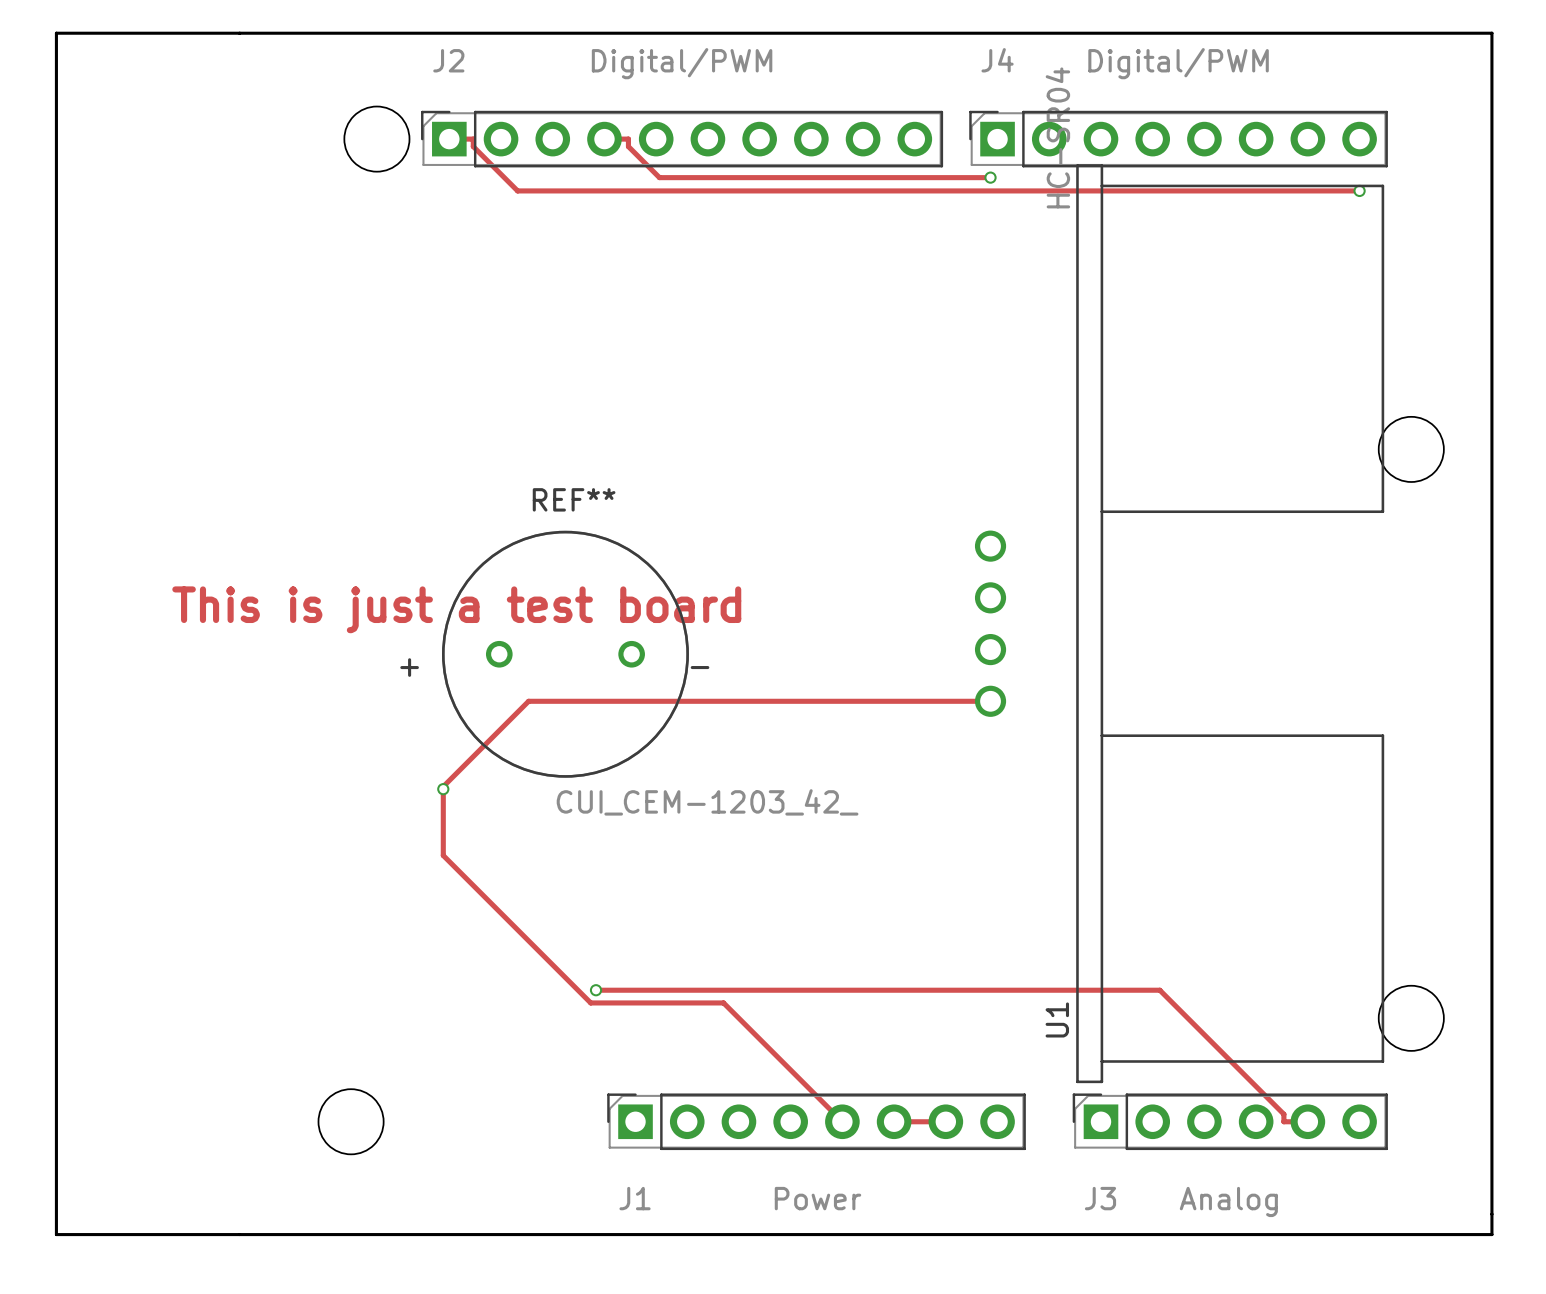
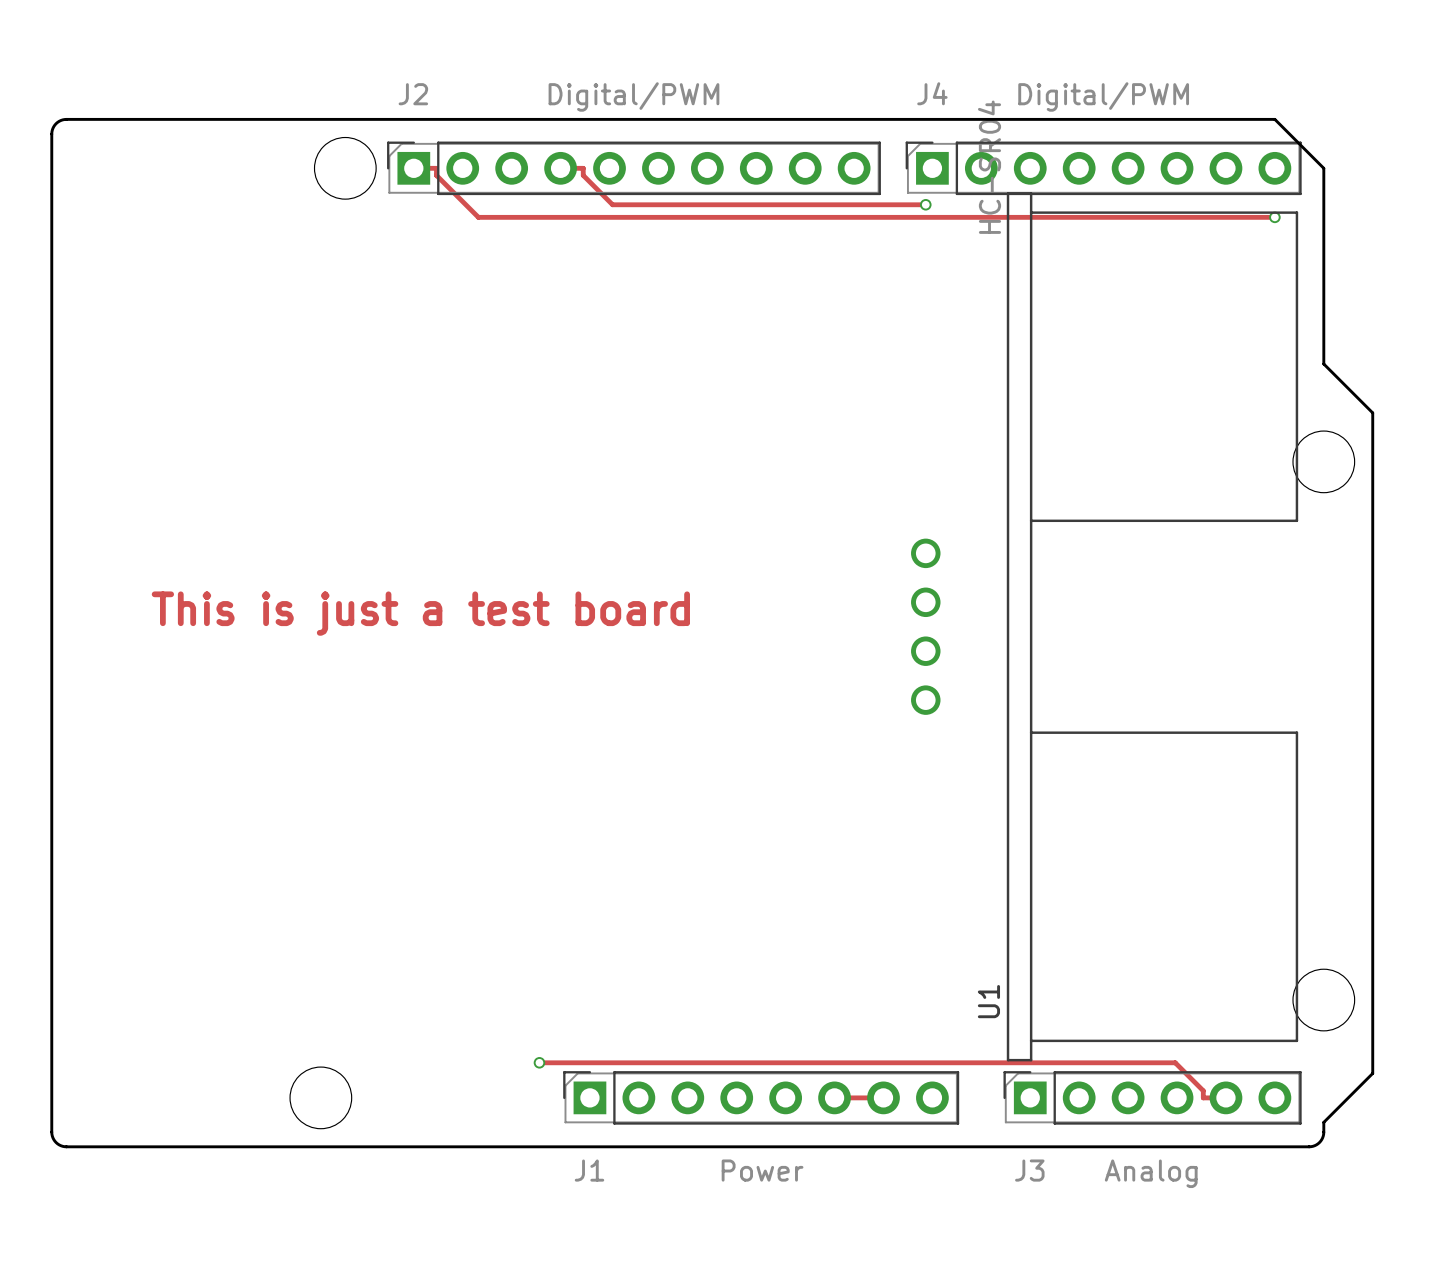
board edge: (56, 33) (1491, 33) (1491, 1234) (56, 1234) (56, 33) -> (66, 119) (56, 123) (51, 134) (51, 1132) (57, 1143) (66, 1146) (1309, 1146) (1320, 1141) (1323, 1134) (1323, 1122) (1372, 1073) (1372, 412) (1323, 364) (1323, 168) (1274, 119) (66, 119)
REF**: CUI_CEM-1203_42_ (565, 654) -> none
track: (990, 701) (528, 701) (443, 786) (443, 855) (590, 1002) (723, 1002) (842, 1121) -> none
via: (443, 789) -> none
track: (596, 990) (1159, 990) (1254, 1084) -> (539, 1062) (1175, 1062)
via position: (596, 990) -> (539, 1062)

